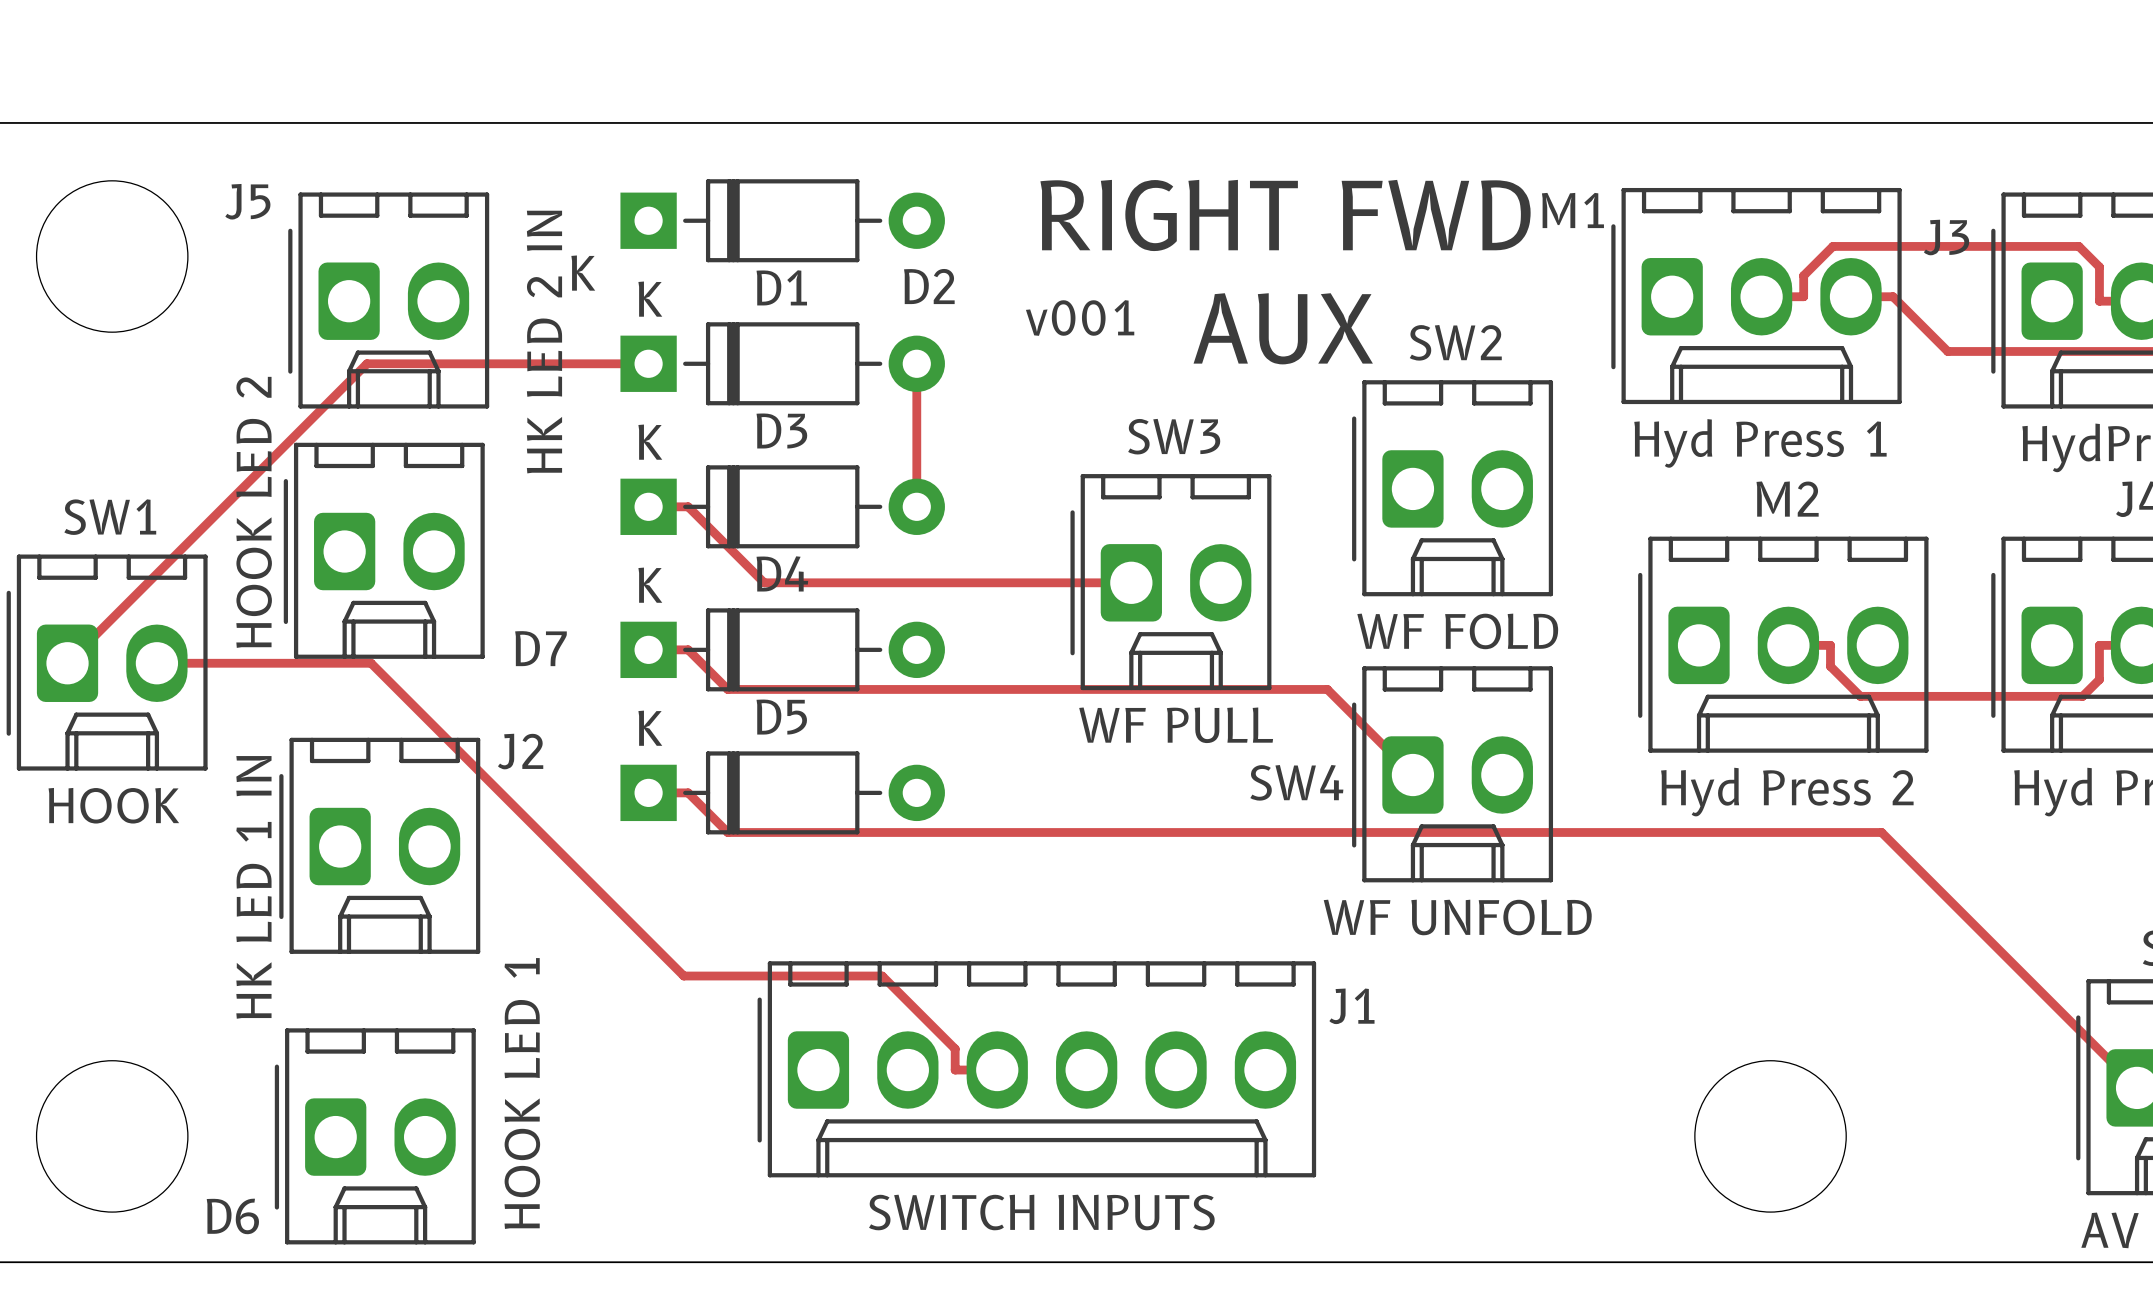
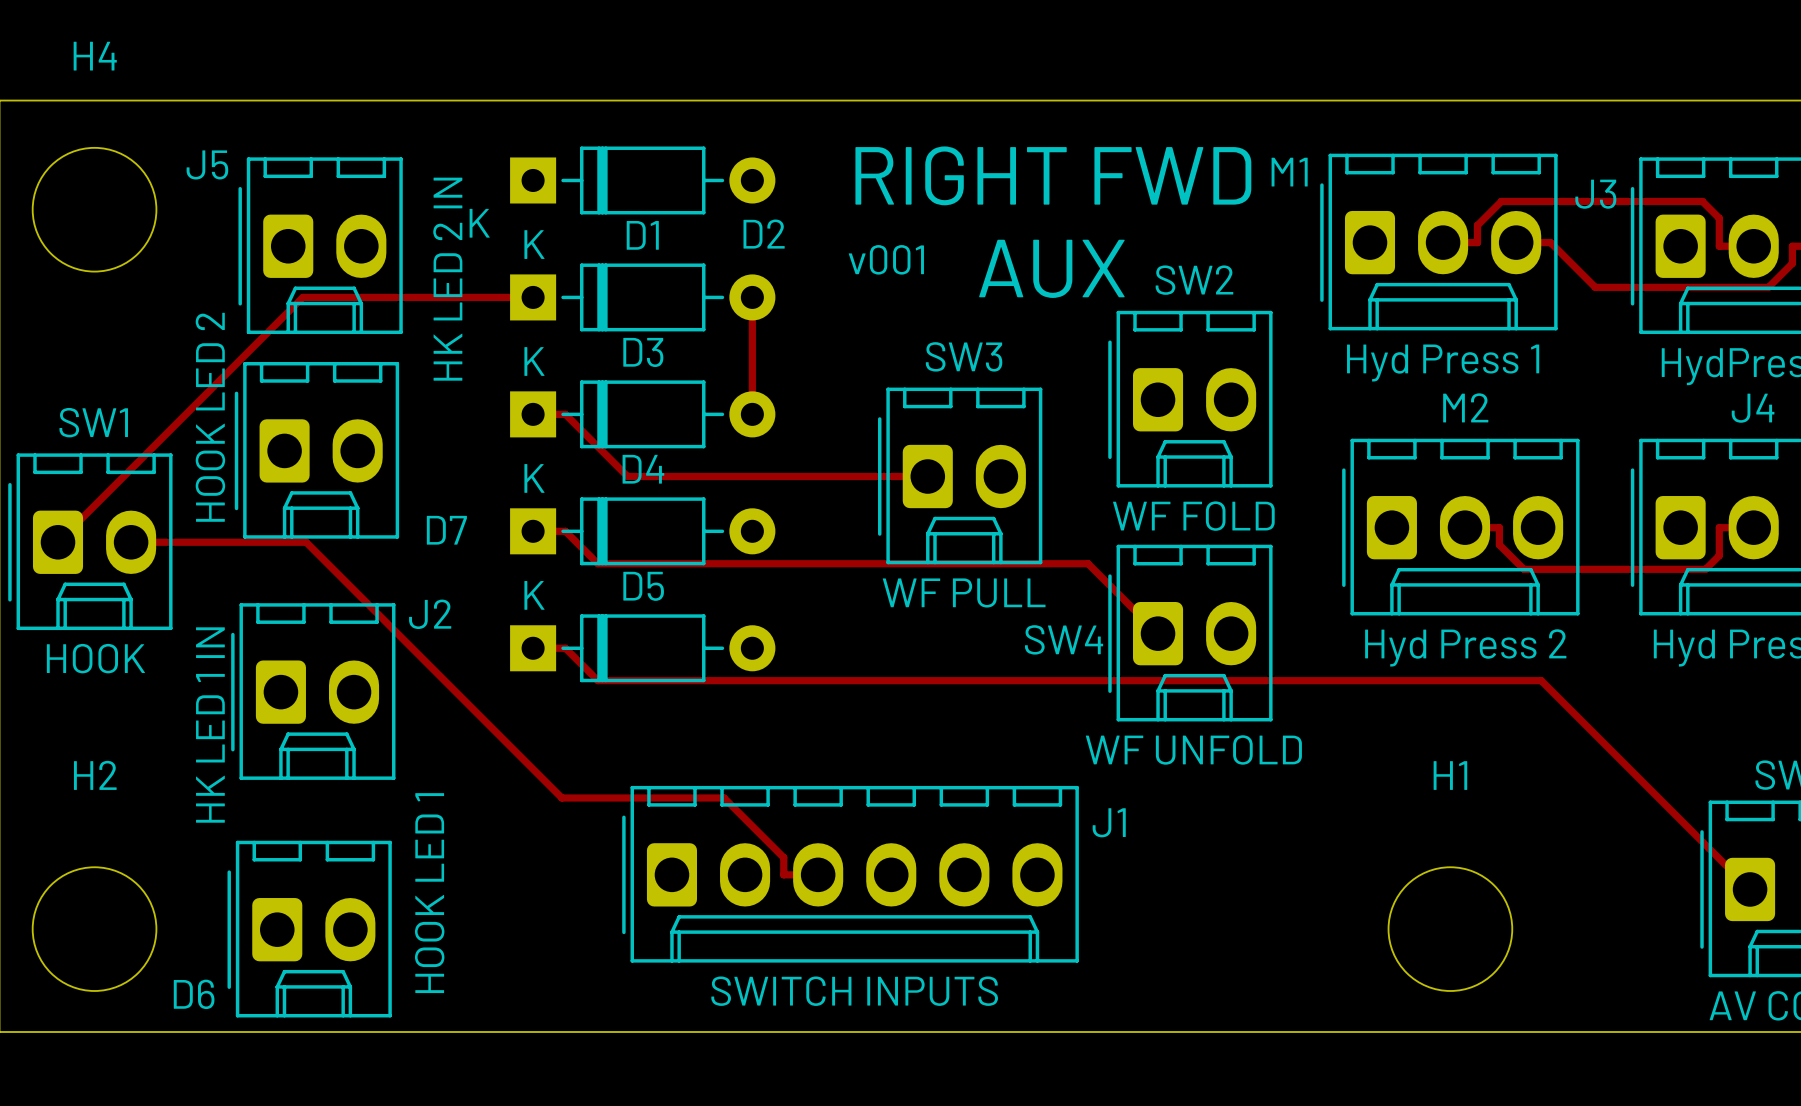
H4 name: none -> H4 (95, 56)
H2 name: none -> H2 (95, 775)
H1 name: none -> H1 (1450, 775)

